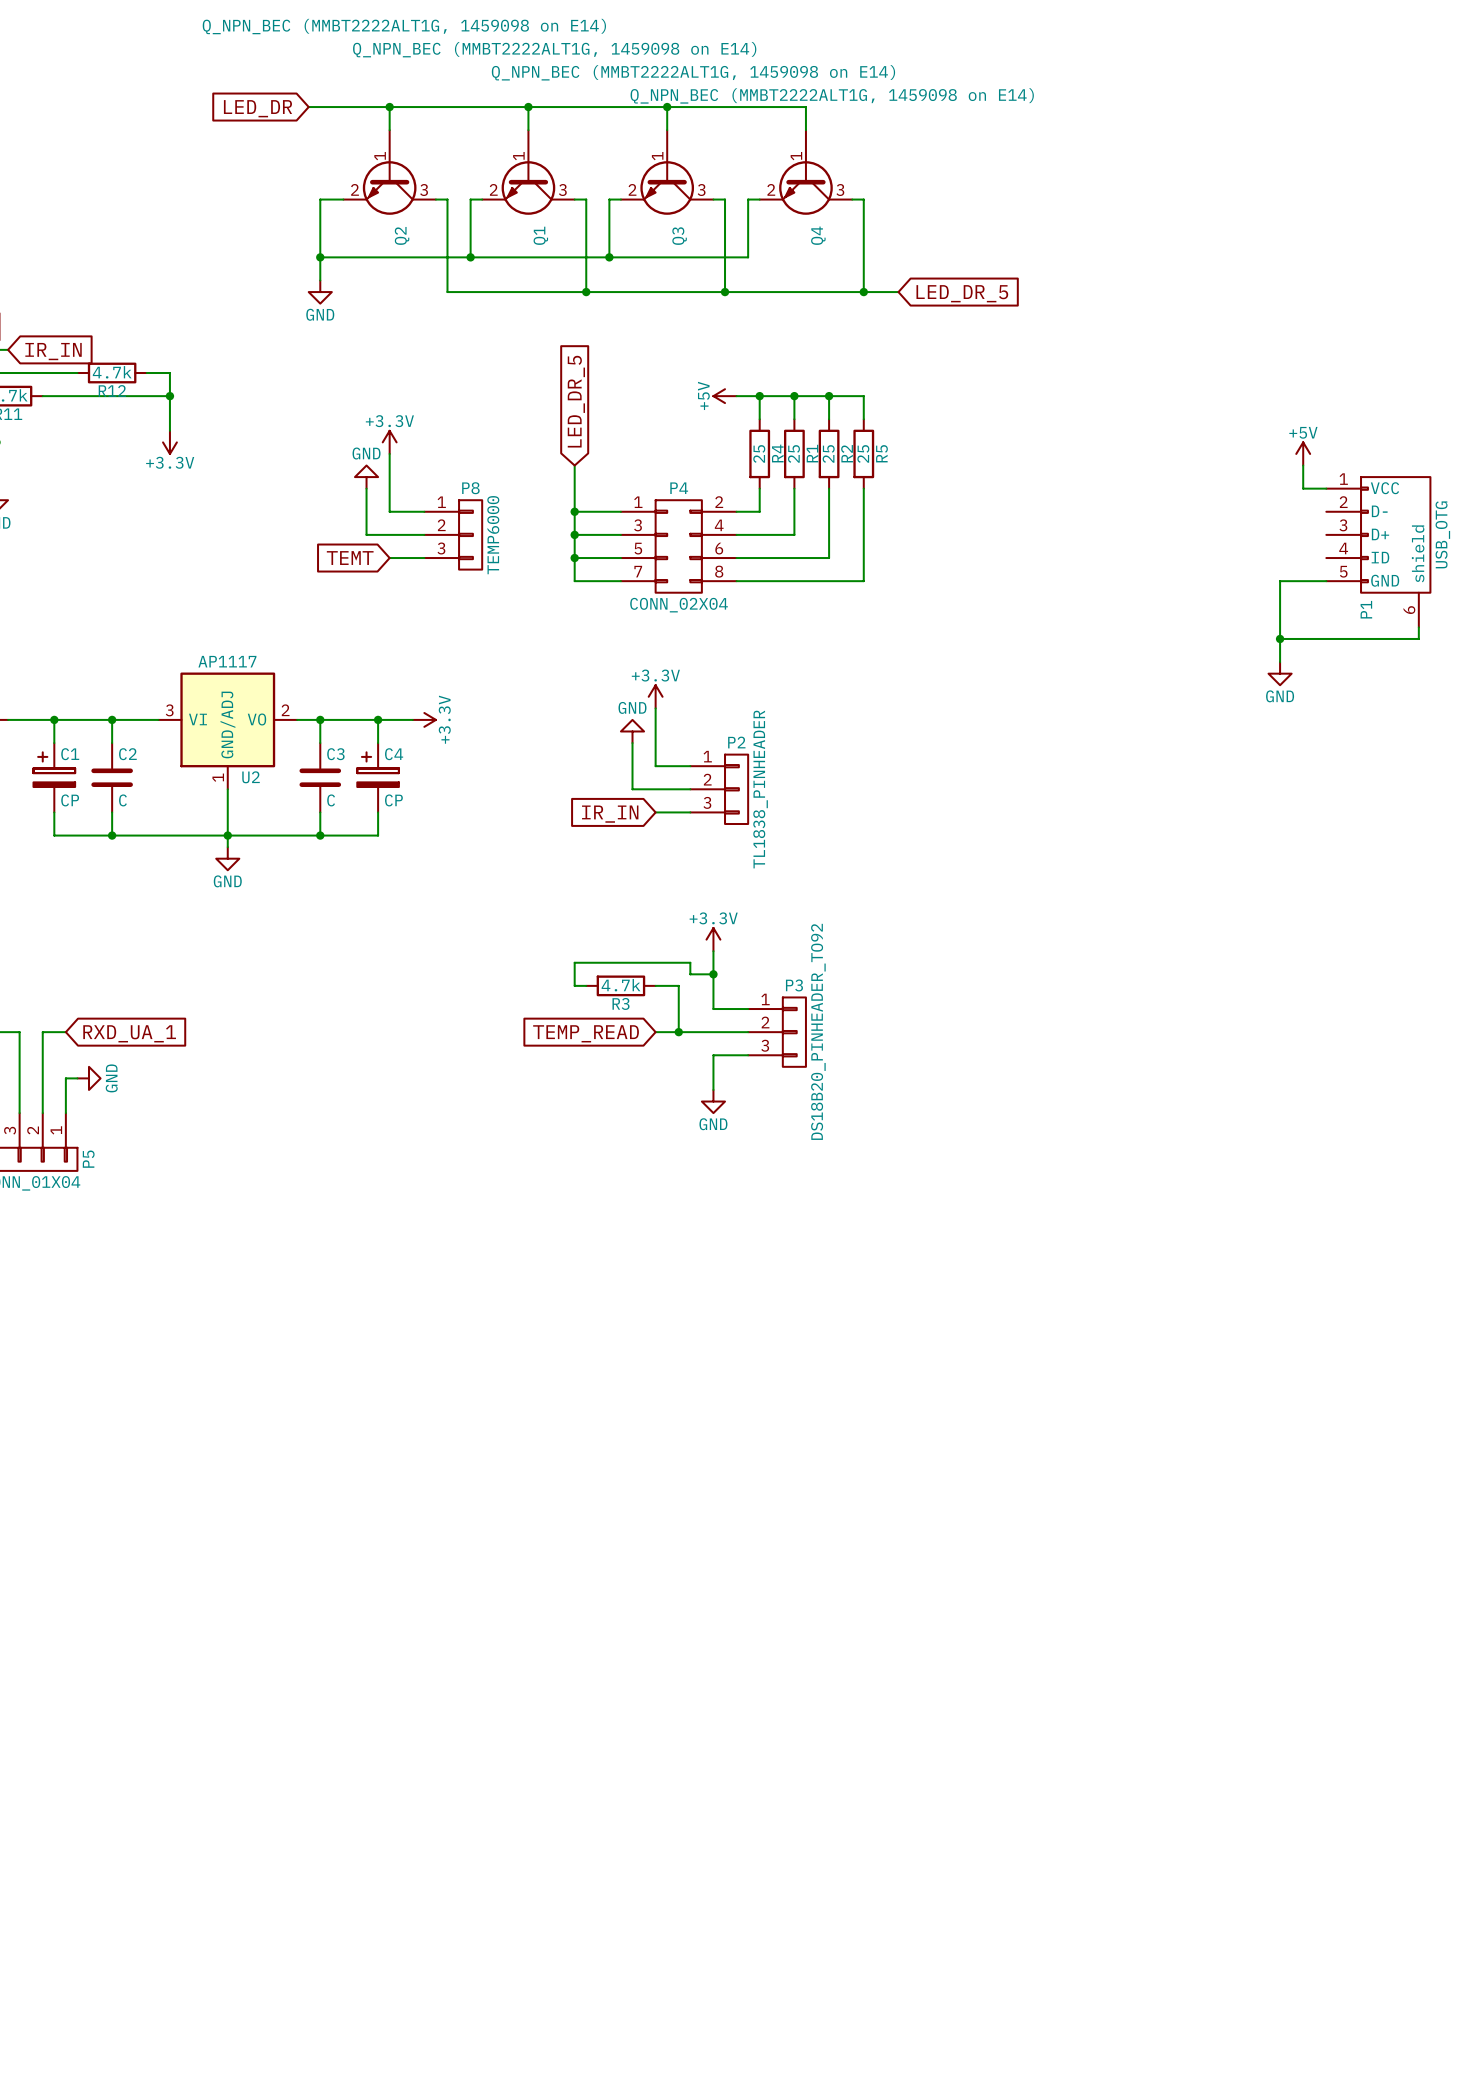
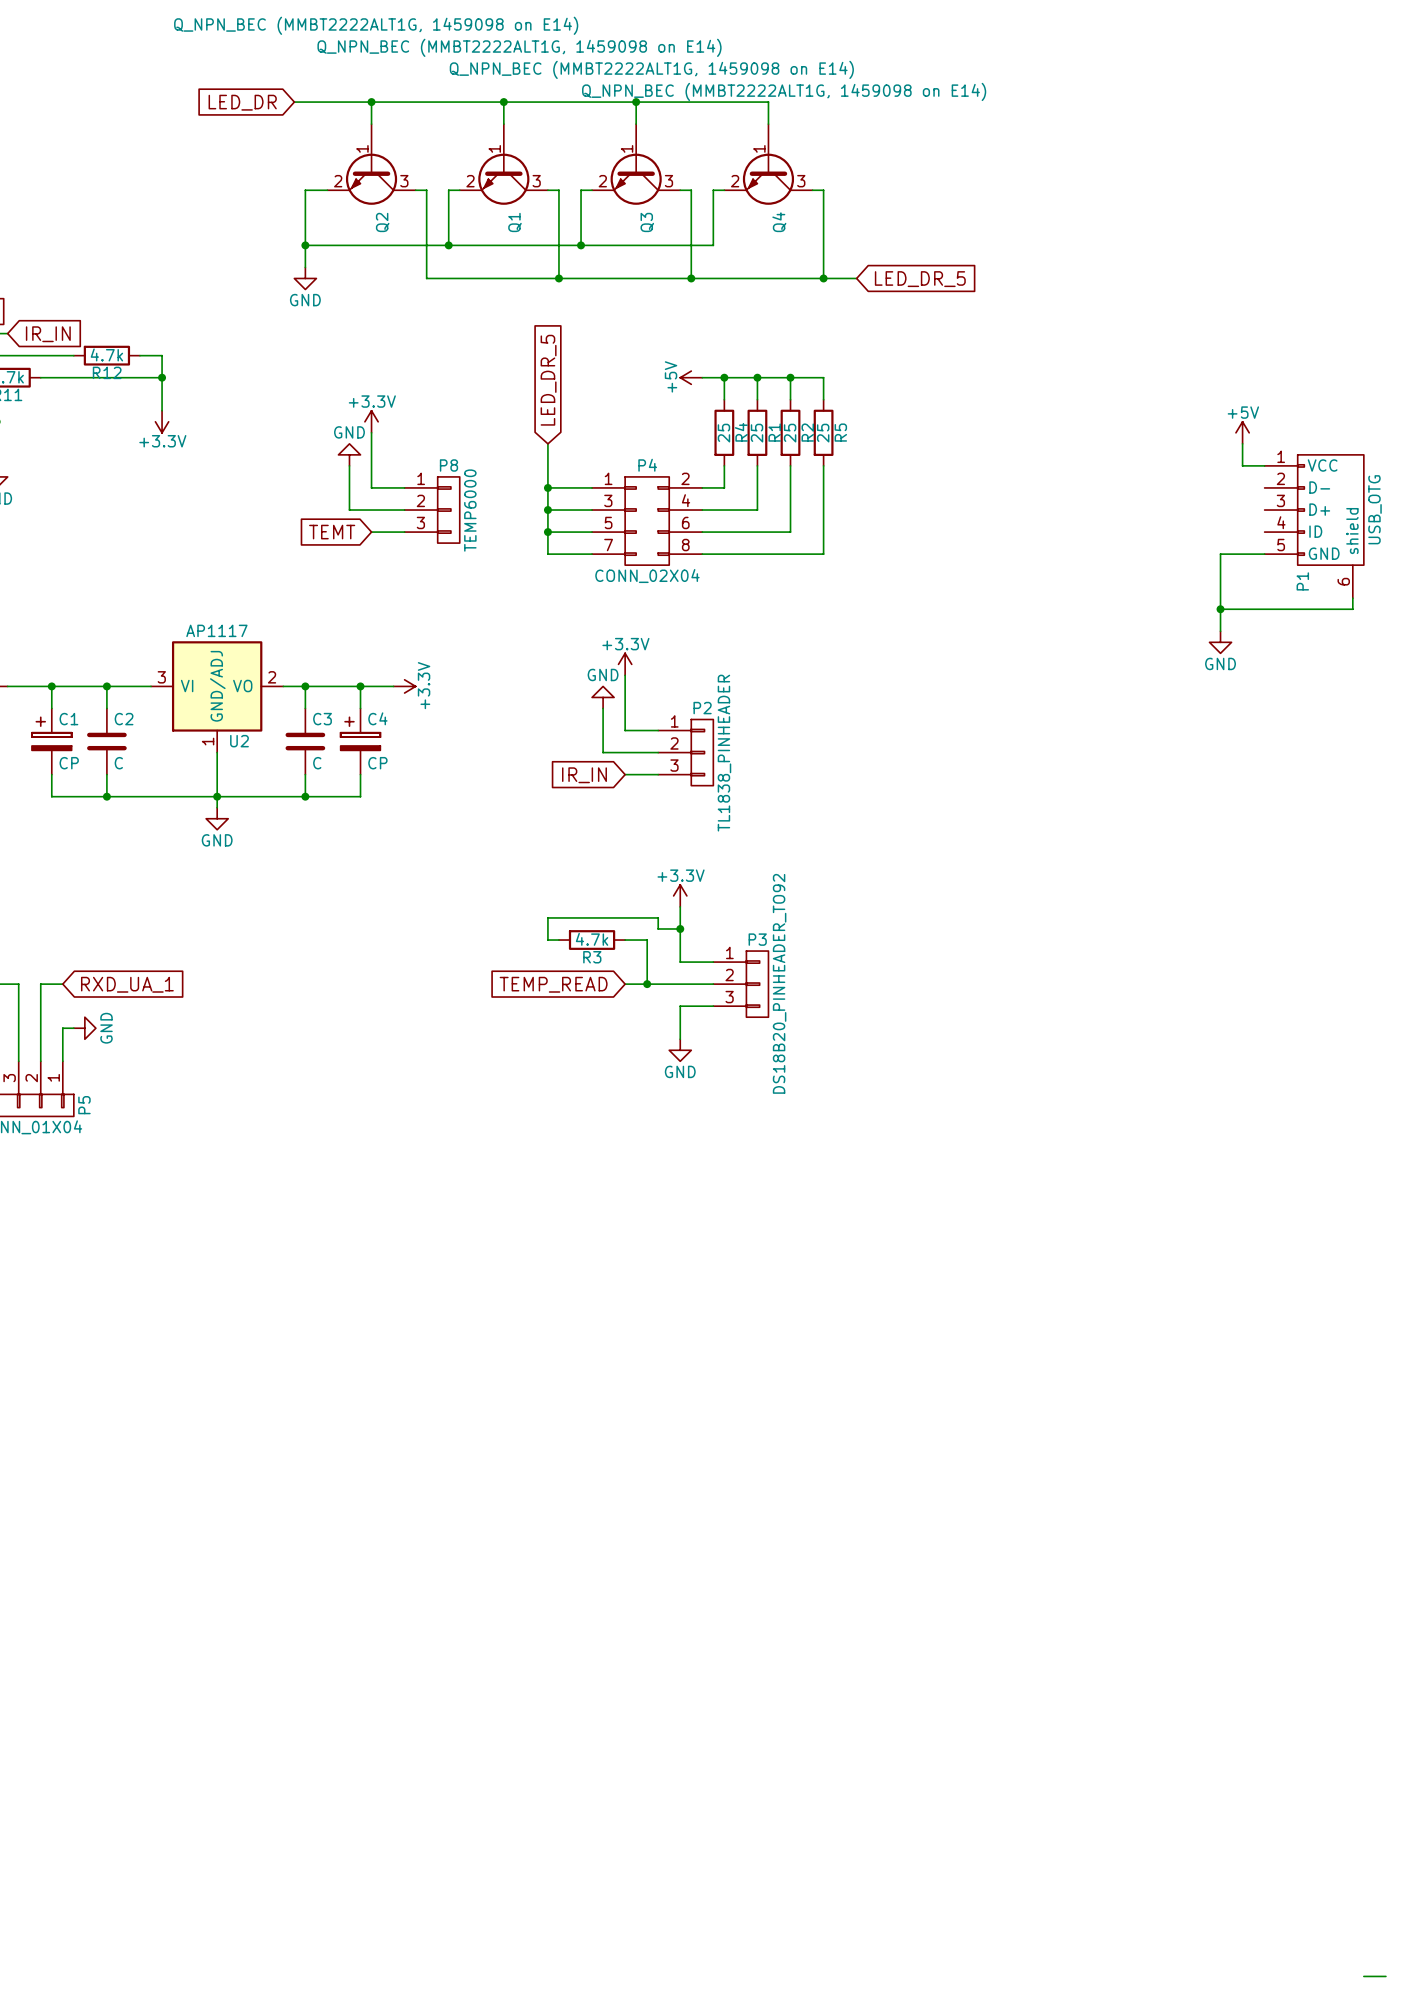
wire: none -> (1363, 1976) (1385, 1976)

